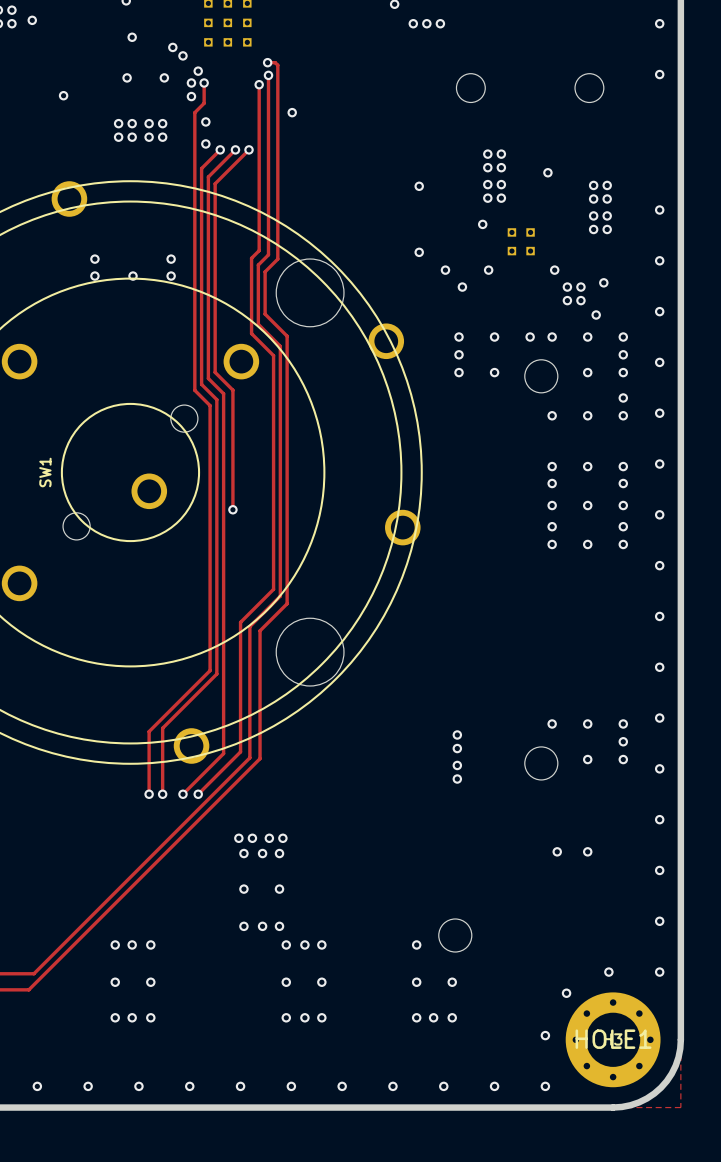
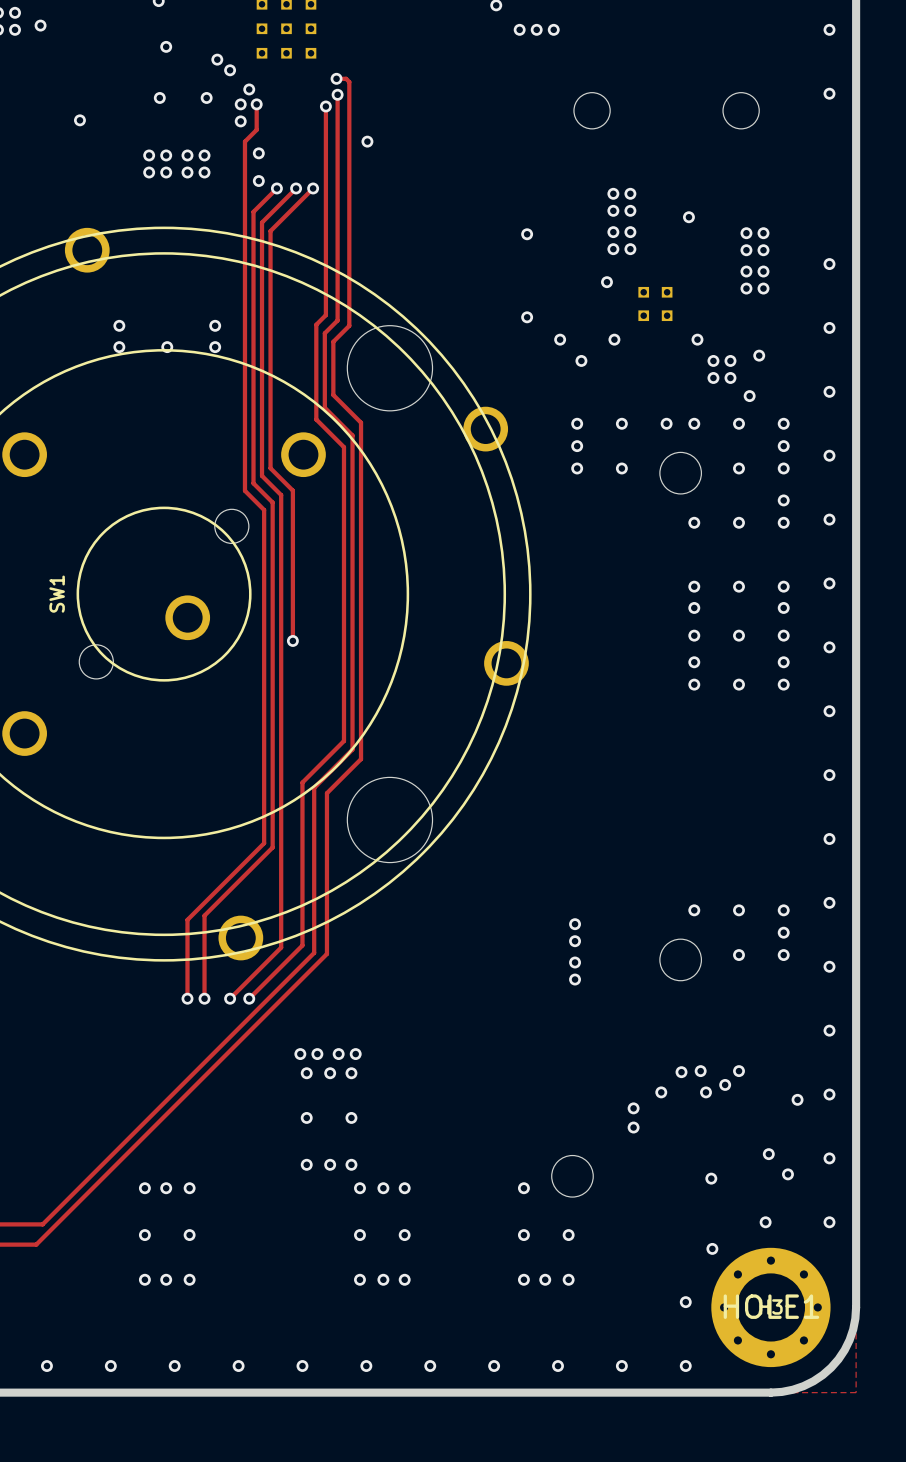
via: none -> (681, 1072)
via: none -> (725, 1084)
via: none -> (661, 1092)
via: none -> (705, 1092)
via: none -> (797, 1099)
via: none -> (633, 1108)
via: none -> (633, 1127)
via: none -> (768, 1154)
via: none -> (787, 1174)
via: none -> (711, 1178)

